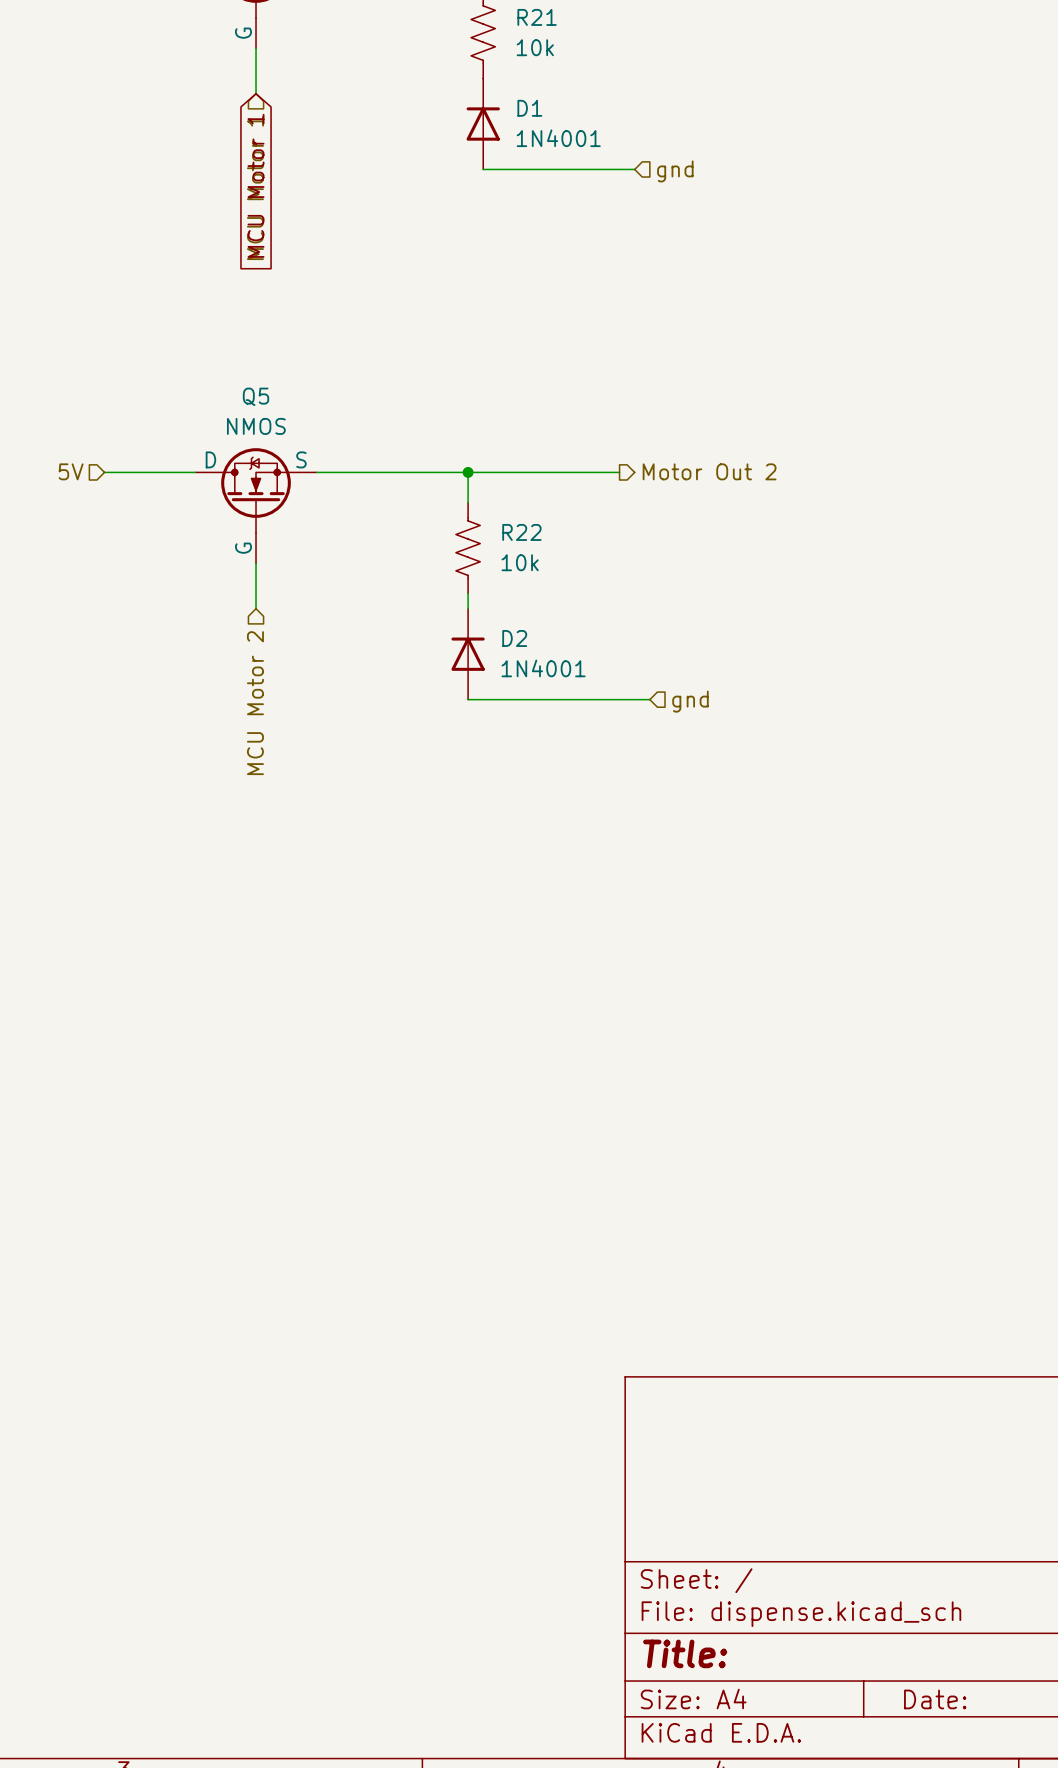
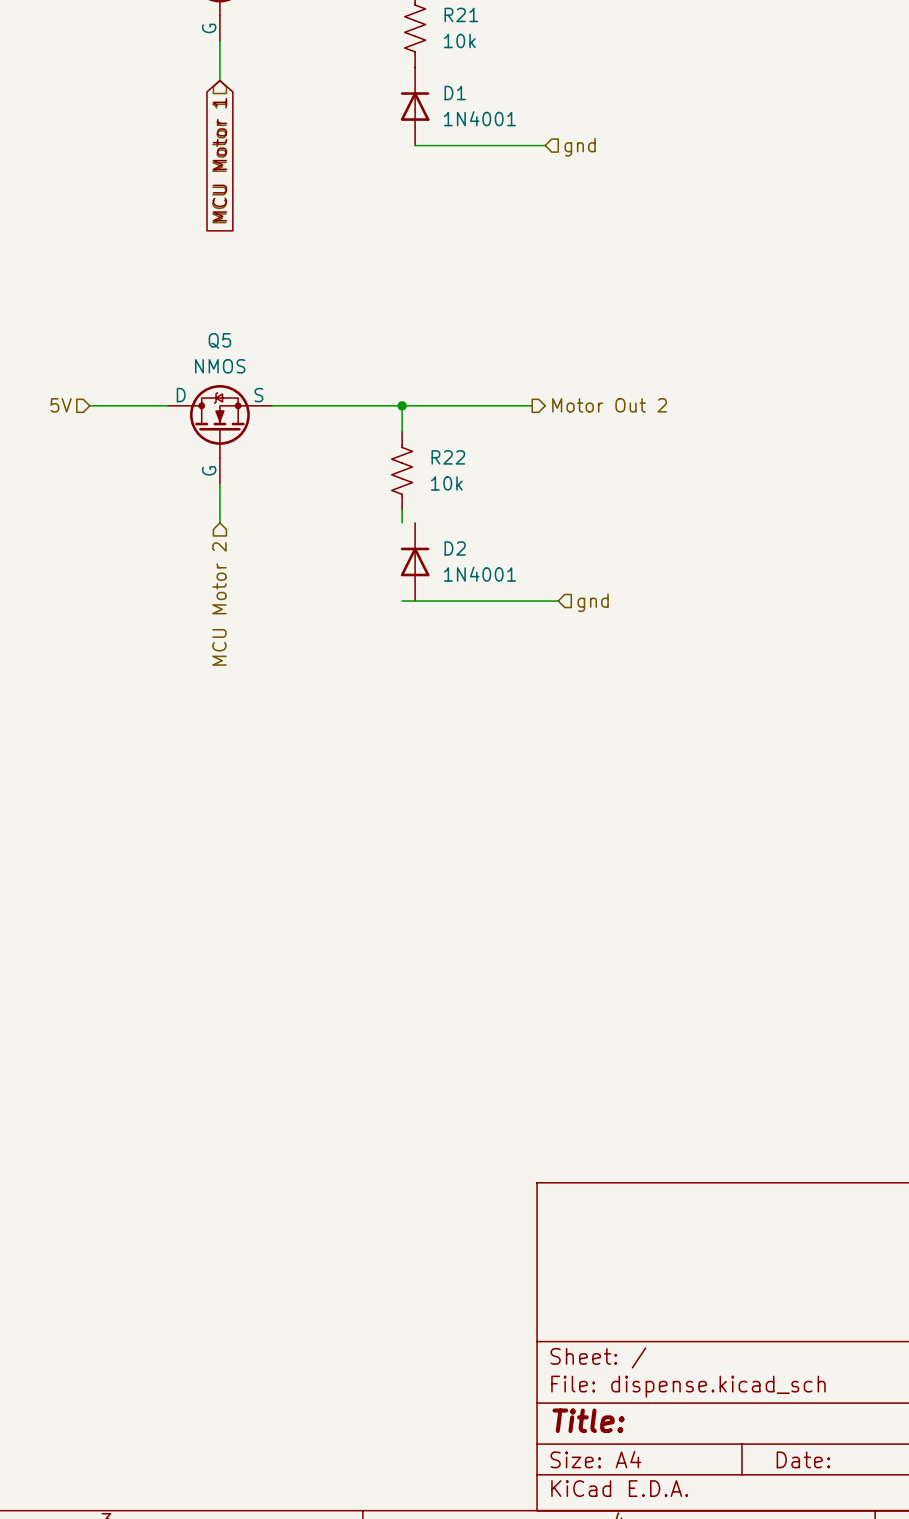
D2 position: (468, 654) -> (415, 561)

